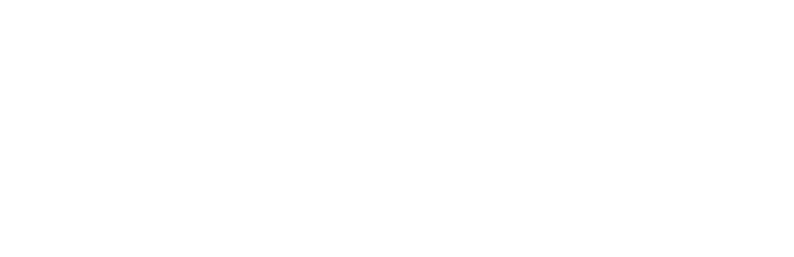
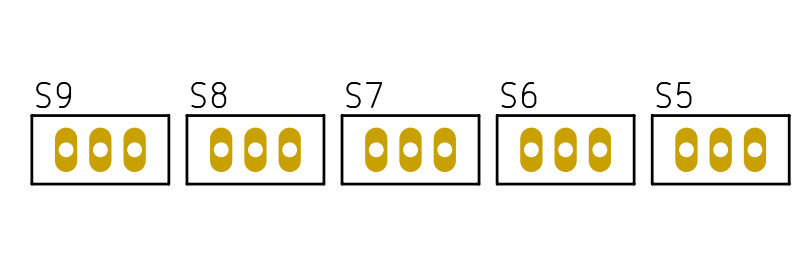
S9: none -> (100, 149)
S8: none -> (255, 149)
S7: none -> (410, 149)
S6: none -> (565, 149)
S5: none -> (720, 149)

